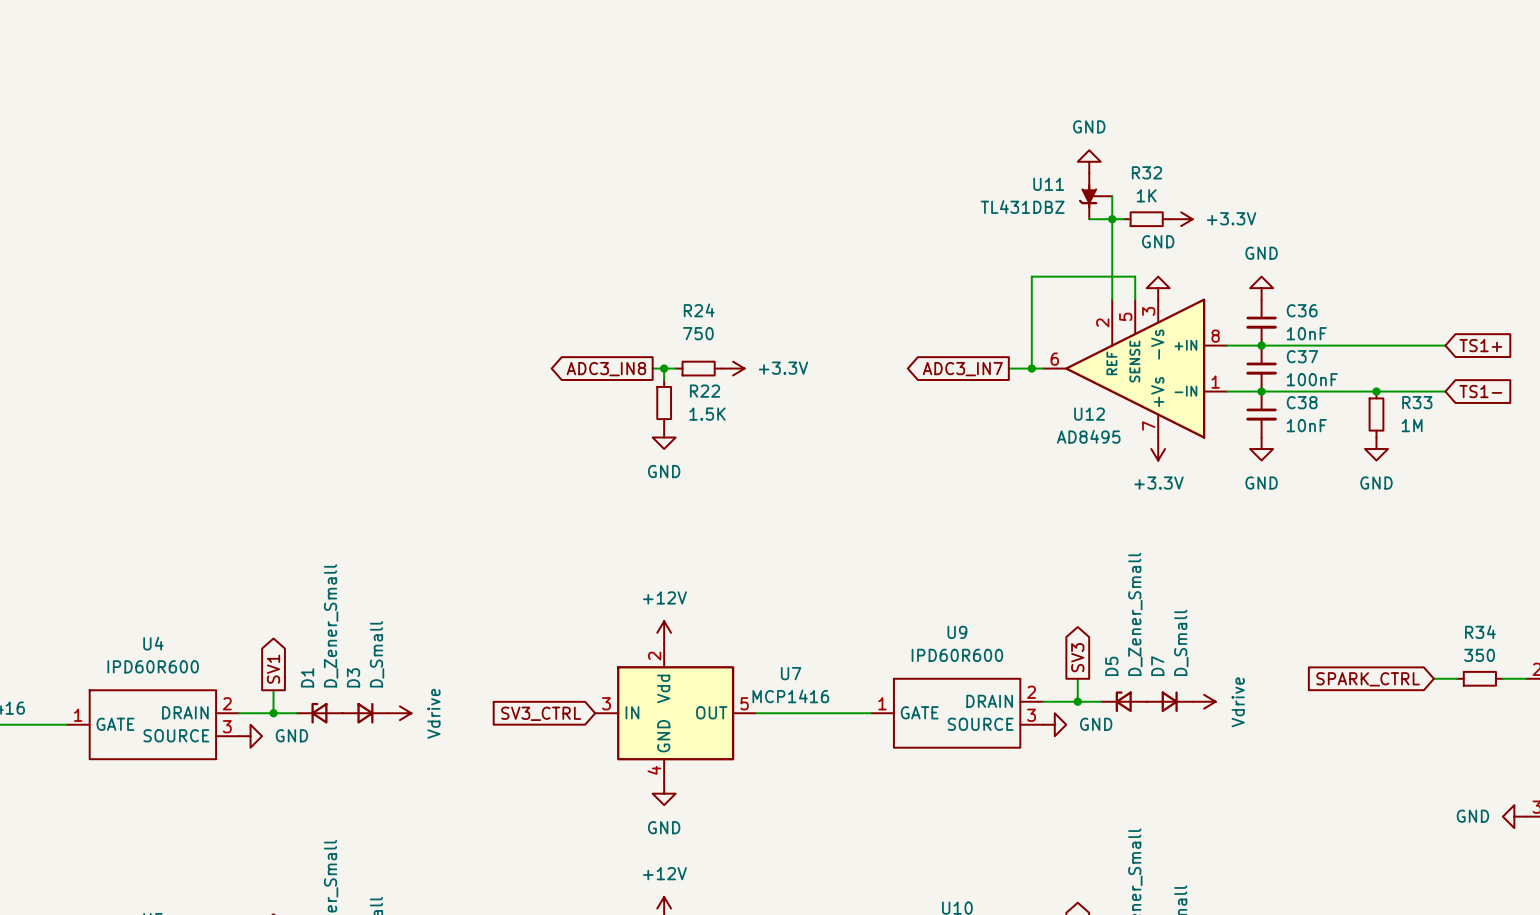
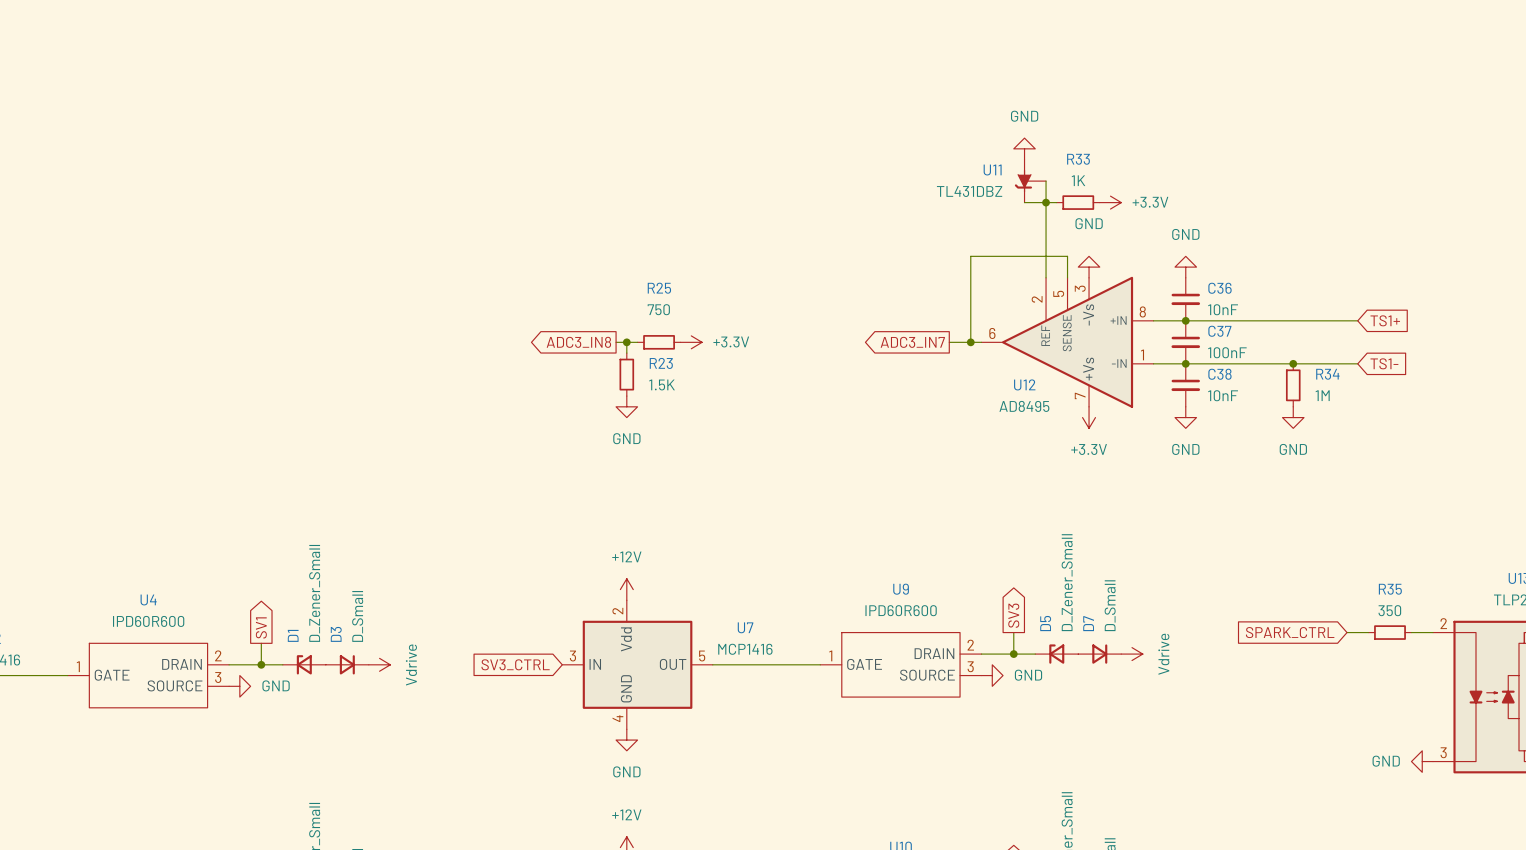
R32 name: R32 (1146, 172) -> R33 (1078, 159)
R24 name: R24 (699, 310) -> R25 (659, 288)
R22 name: R22 (705, 391) -> R23 (661, 363)
R33 name: R33 (1417, 402) -> R34 (1327, 374)
R34 name: R34 (1480, 632) -> R35 (1390, 589)

